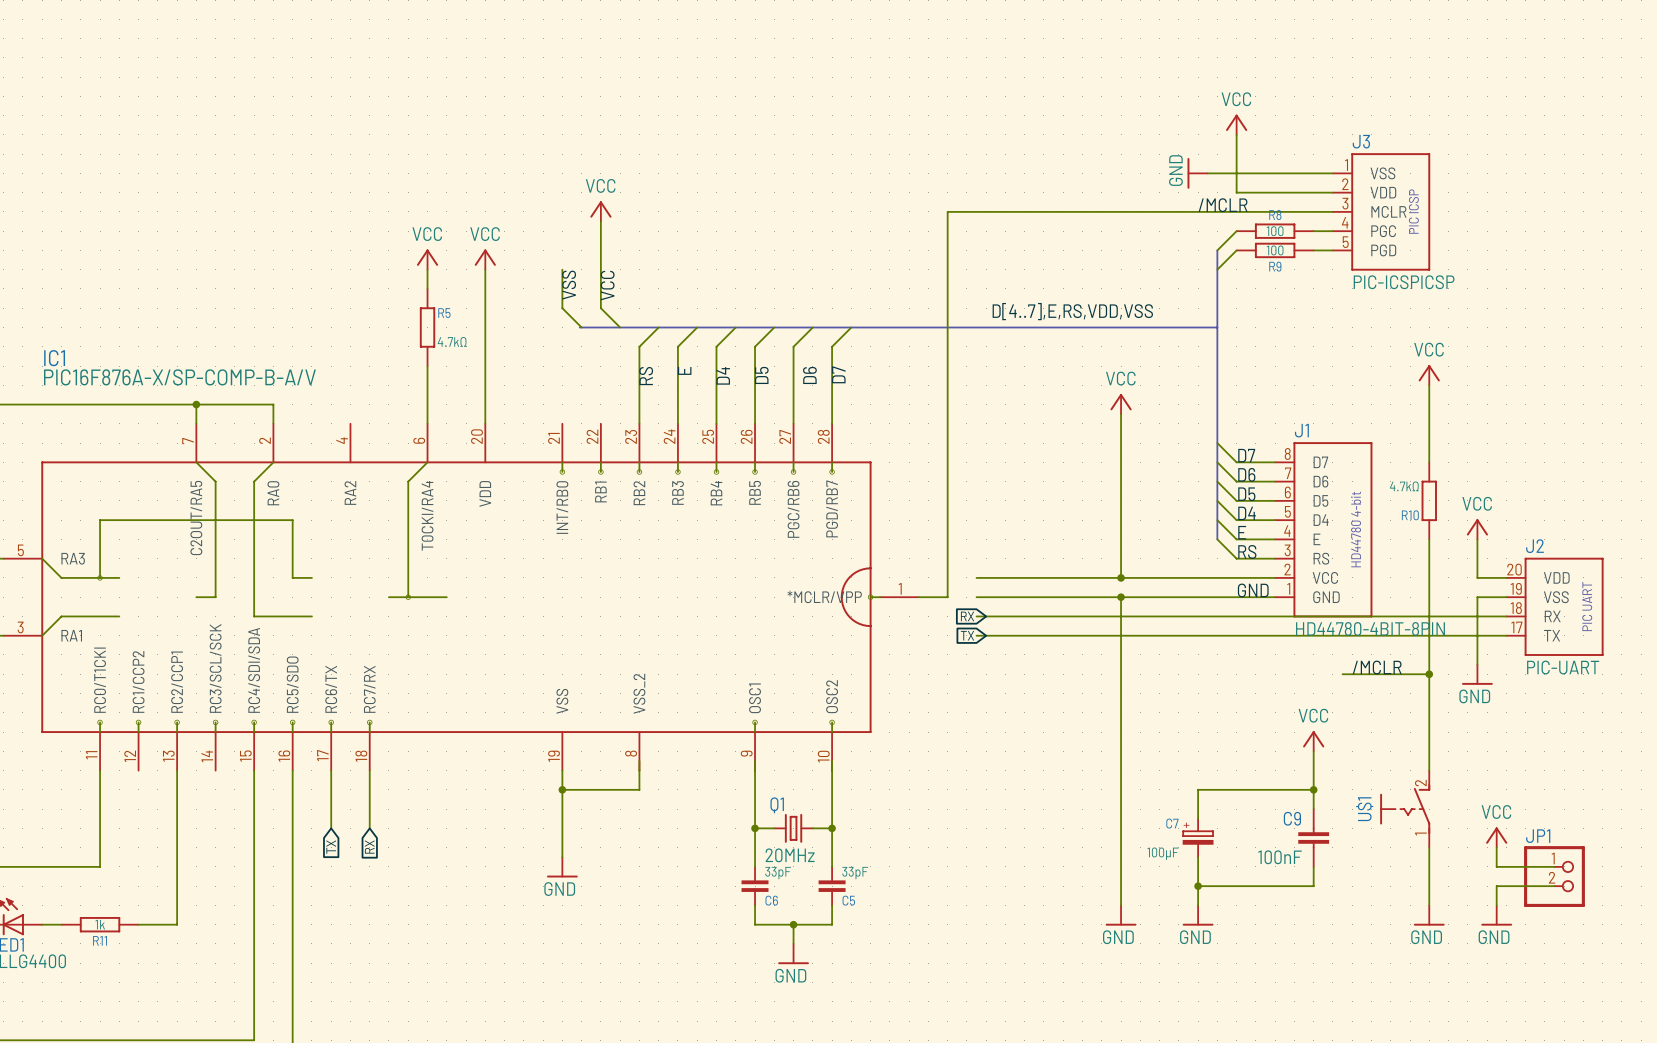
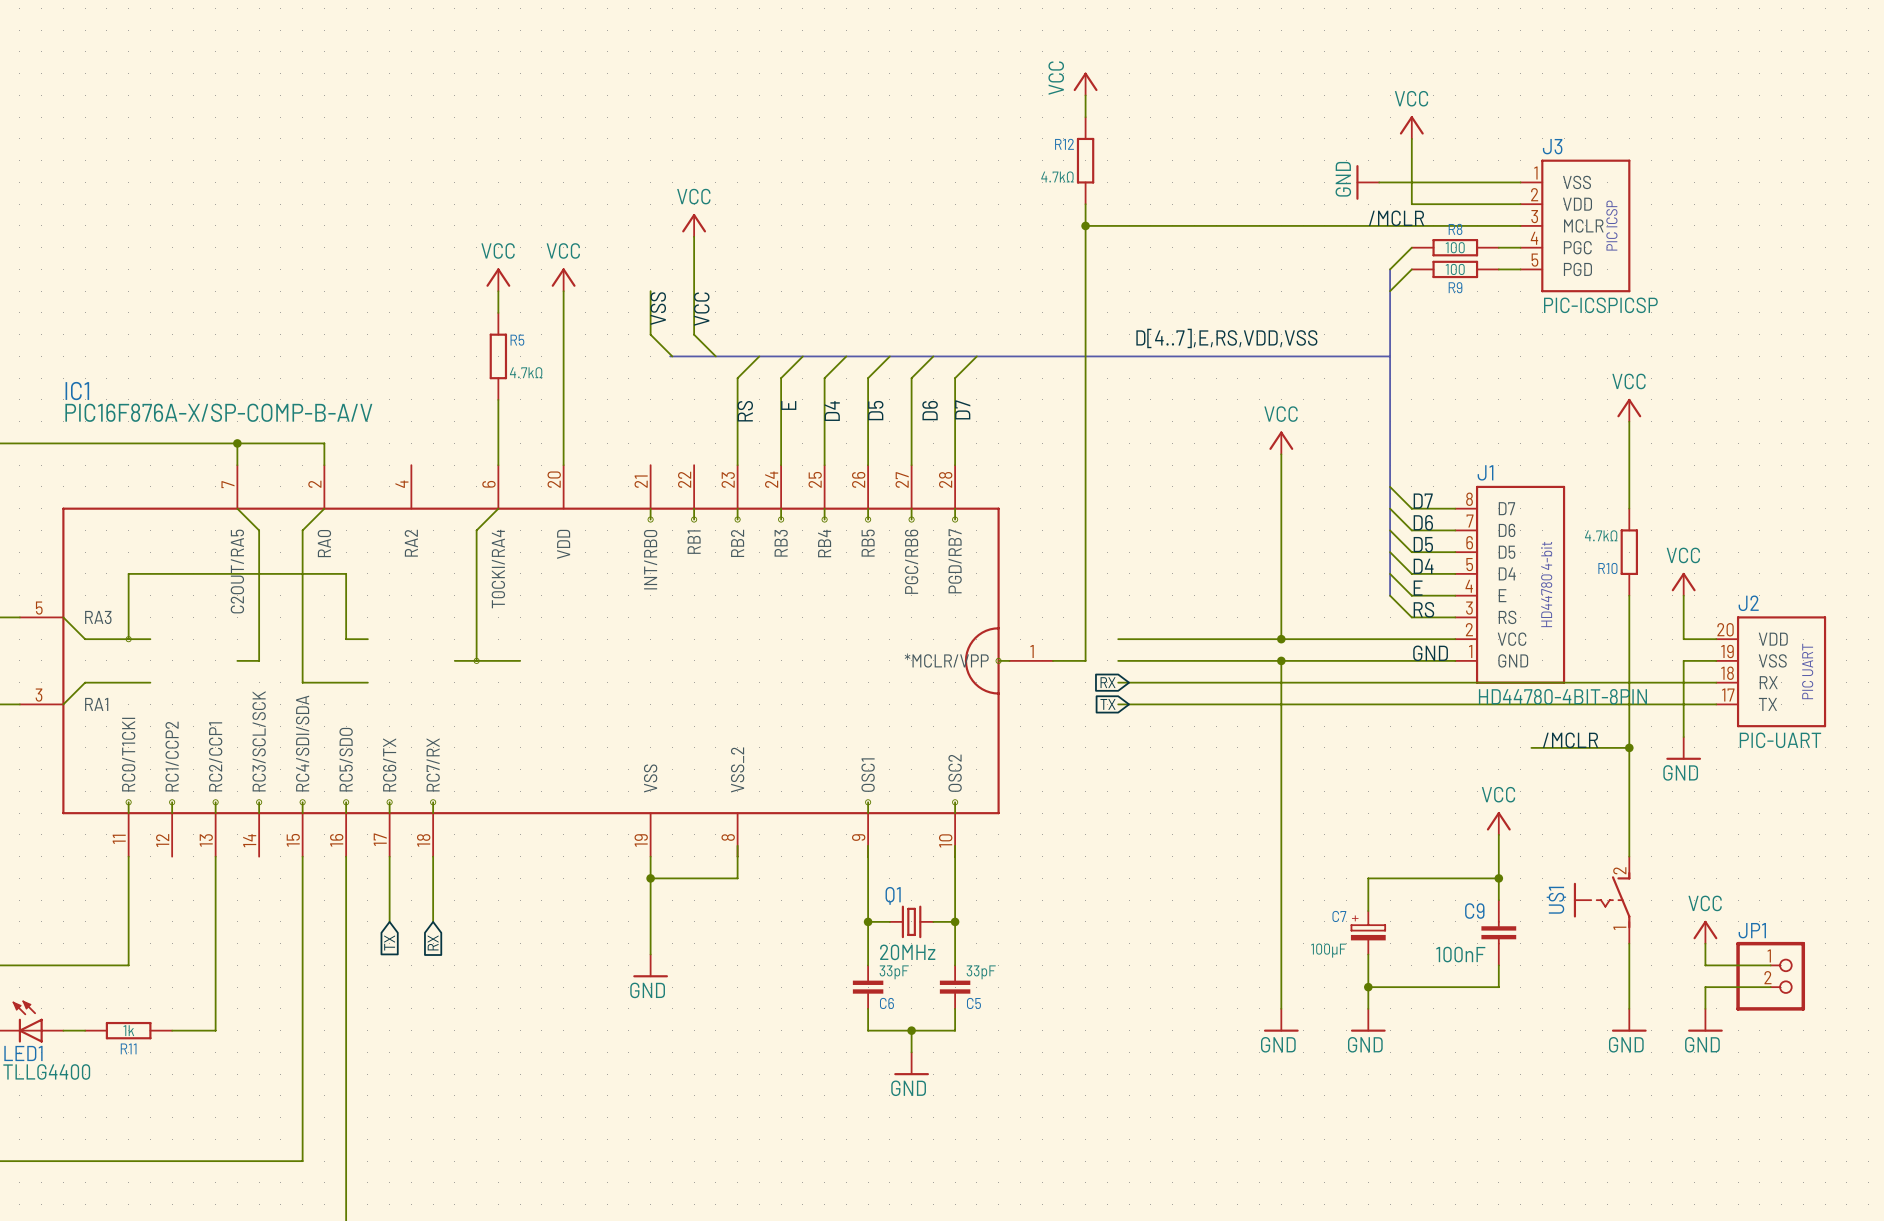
power symbol: none -> VCC (1085, 84)
wire: none -> (1085, 95) (1085, 117)
R12: none -> 4.7kΩ (1085, 160)
wire: none -> (1085, 204) (1085, 225)
junction: none -> (1085, 225)

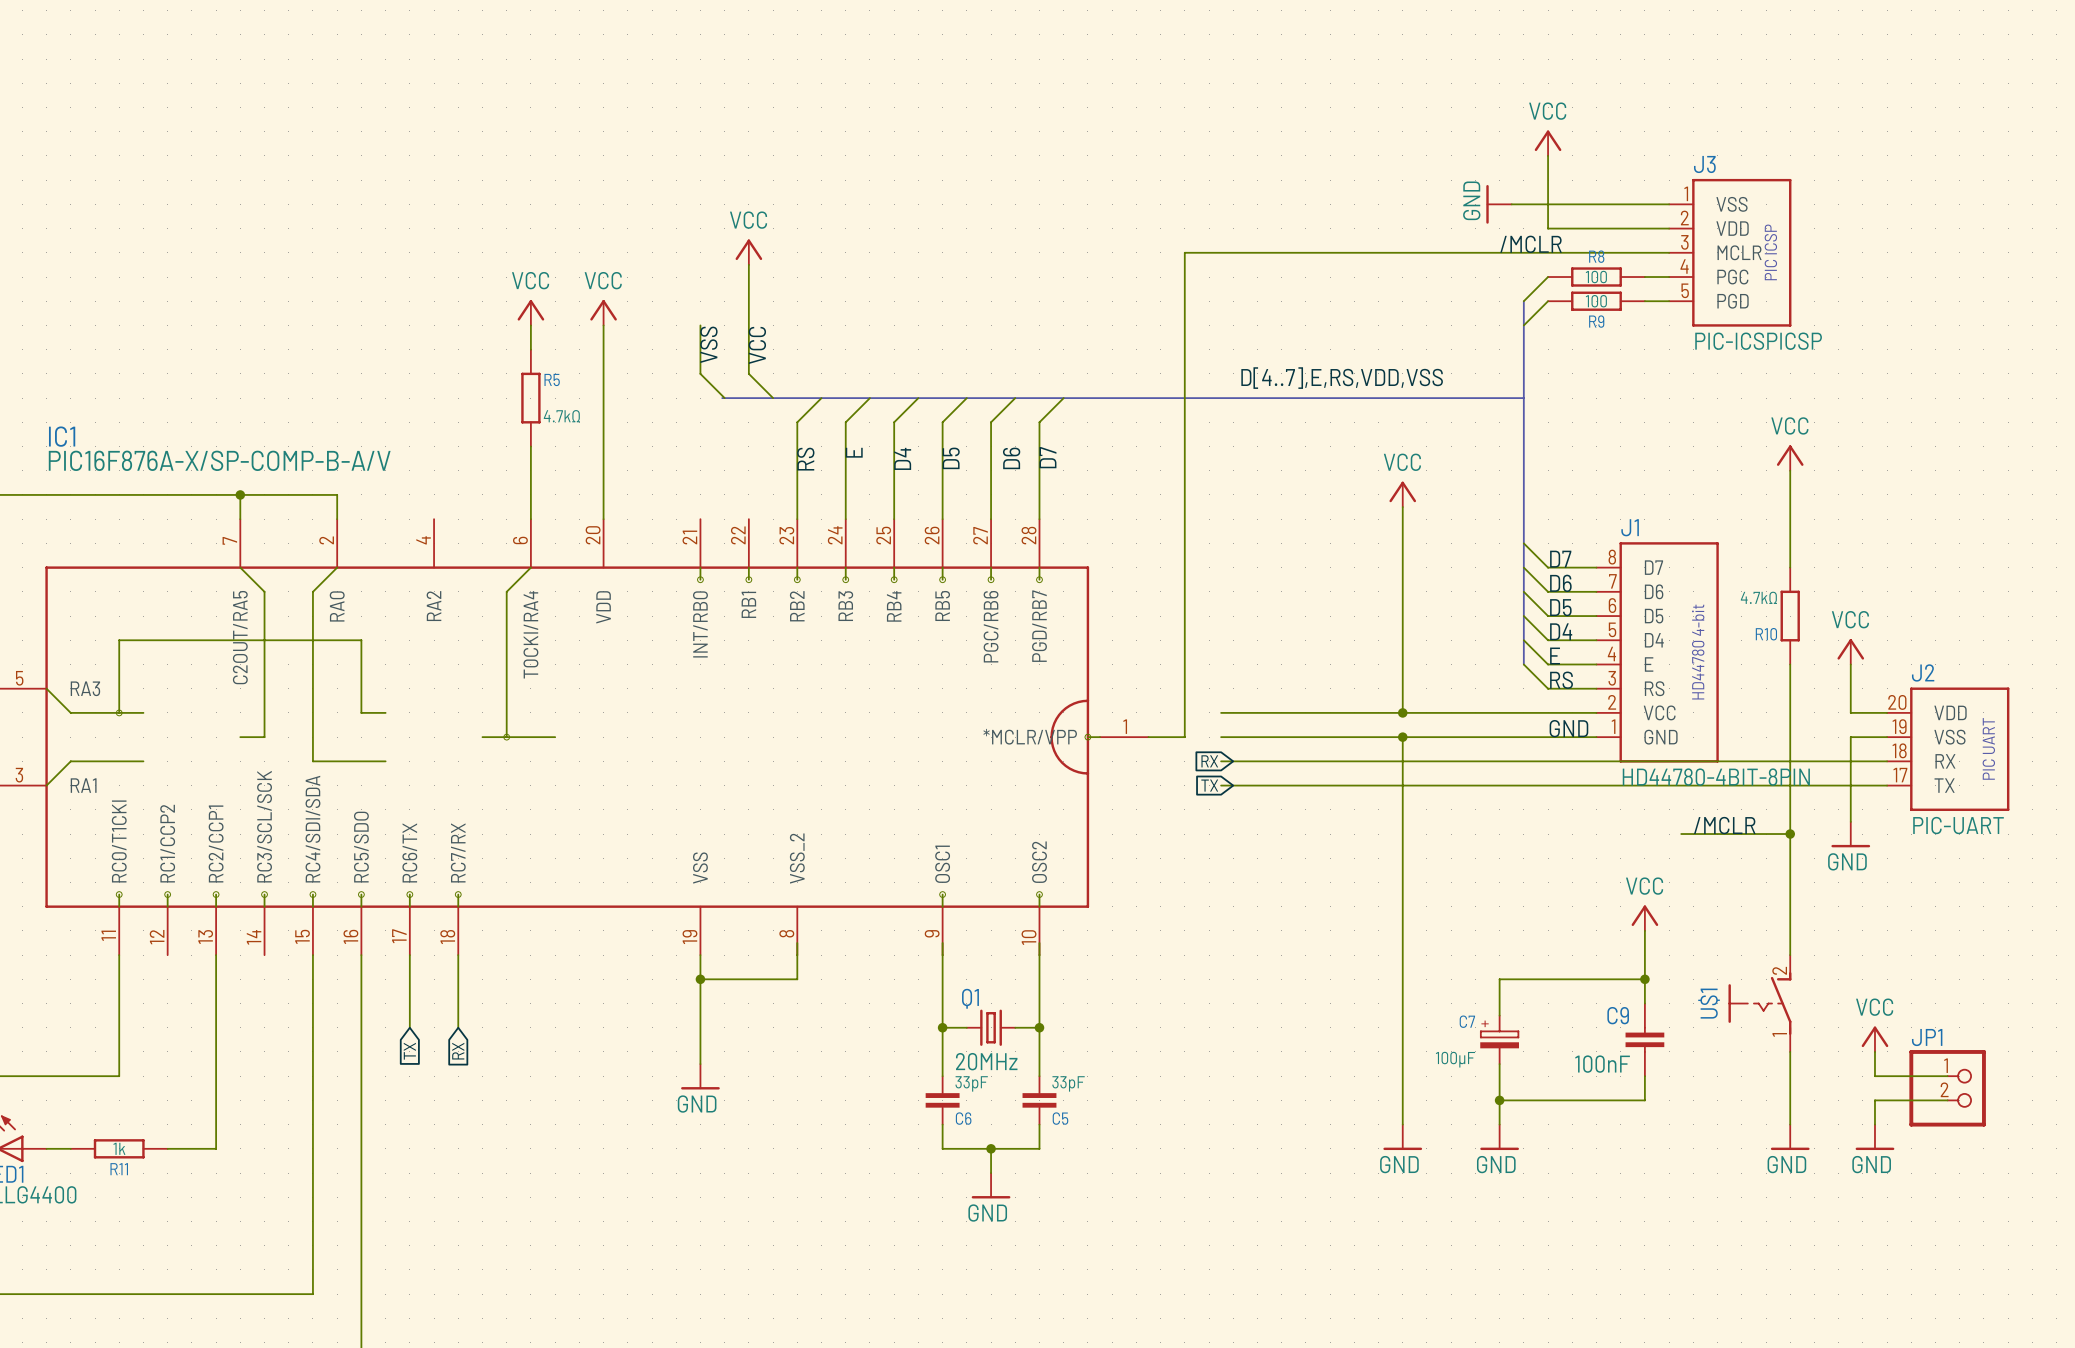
power symbol: VCC (1085, 84) -> none
wire: (1085, 95) (1085, 117) -> none
R12: 4.7kΩ (1085, 160) -> none
wire: (1085, 204) (1085, 225) -> none
junction: (1085, 225) -> none

